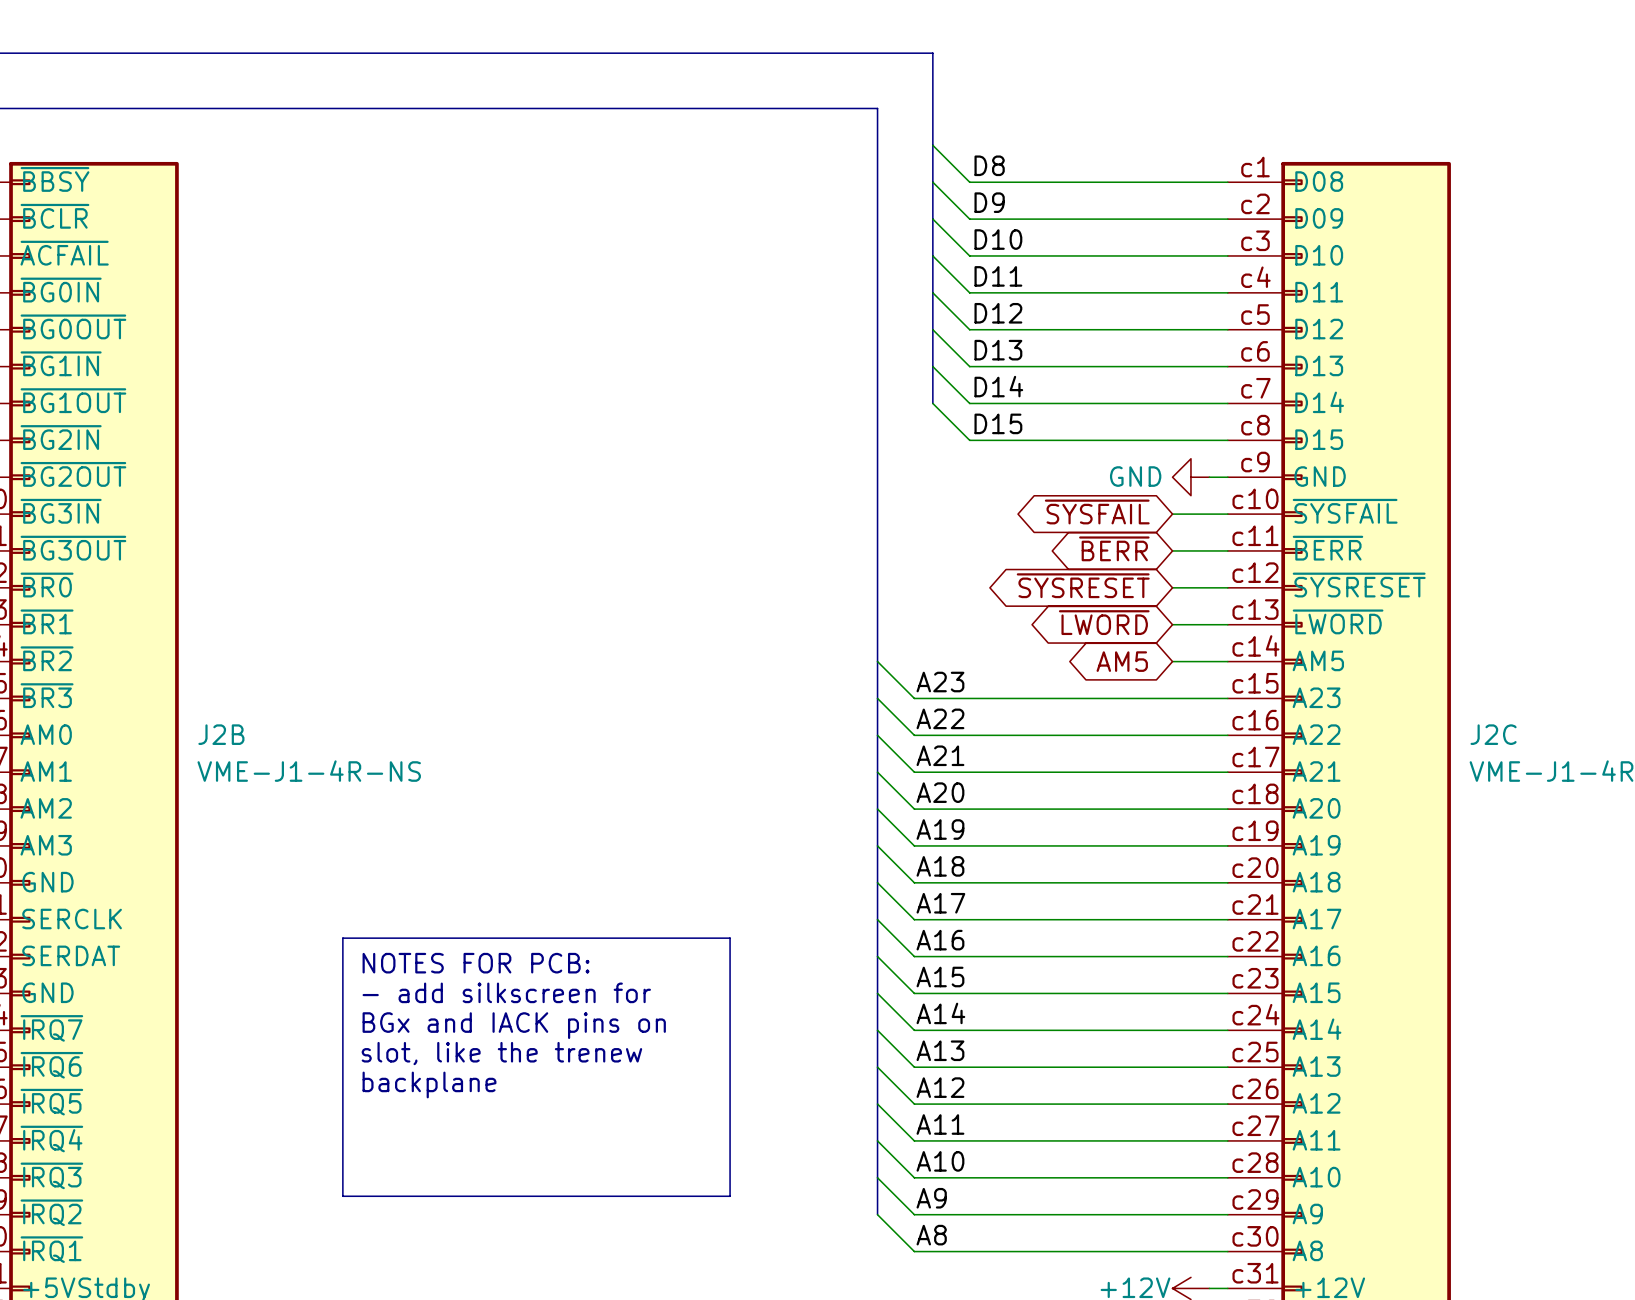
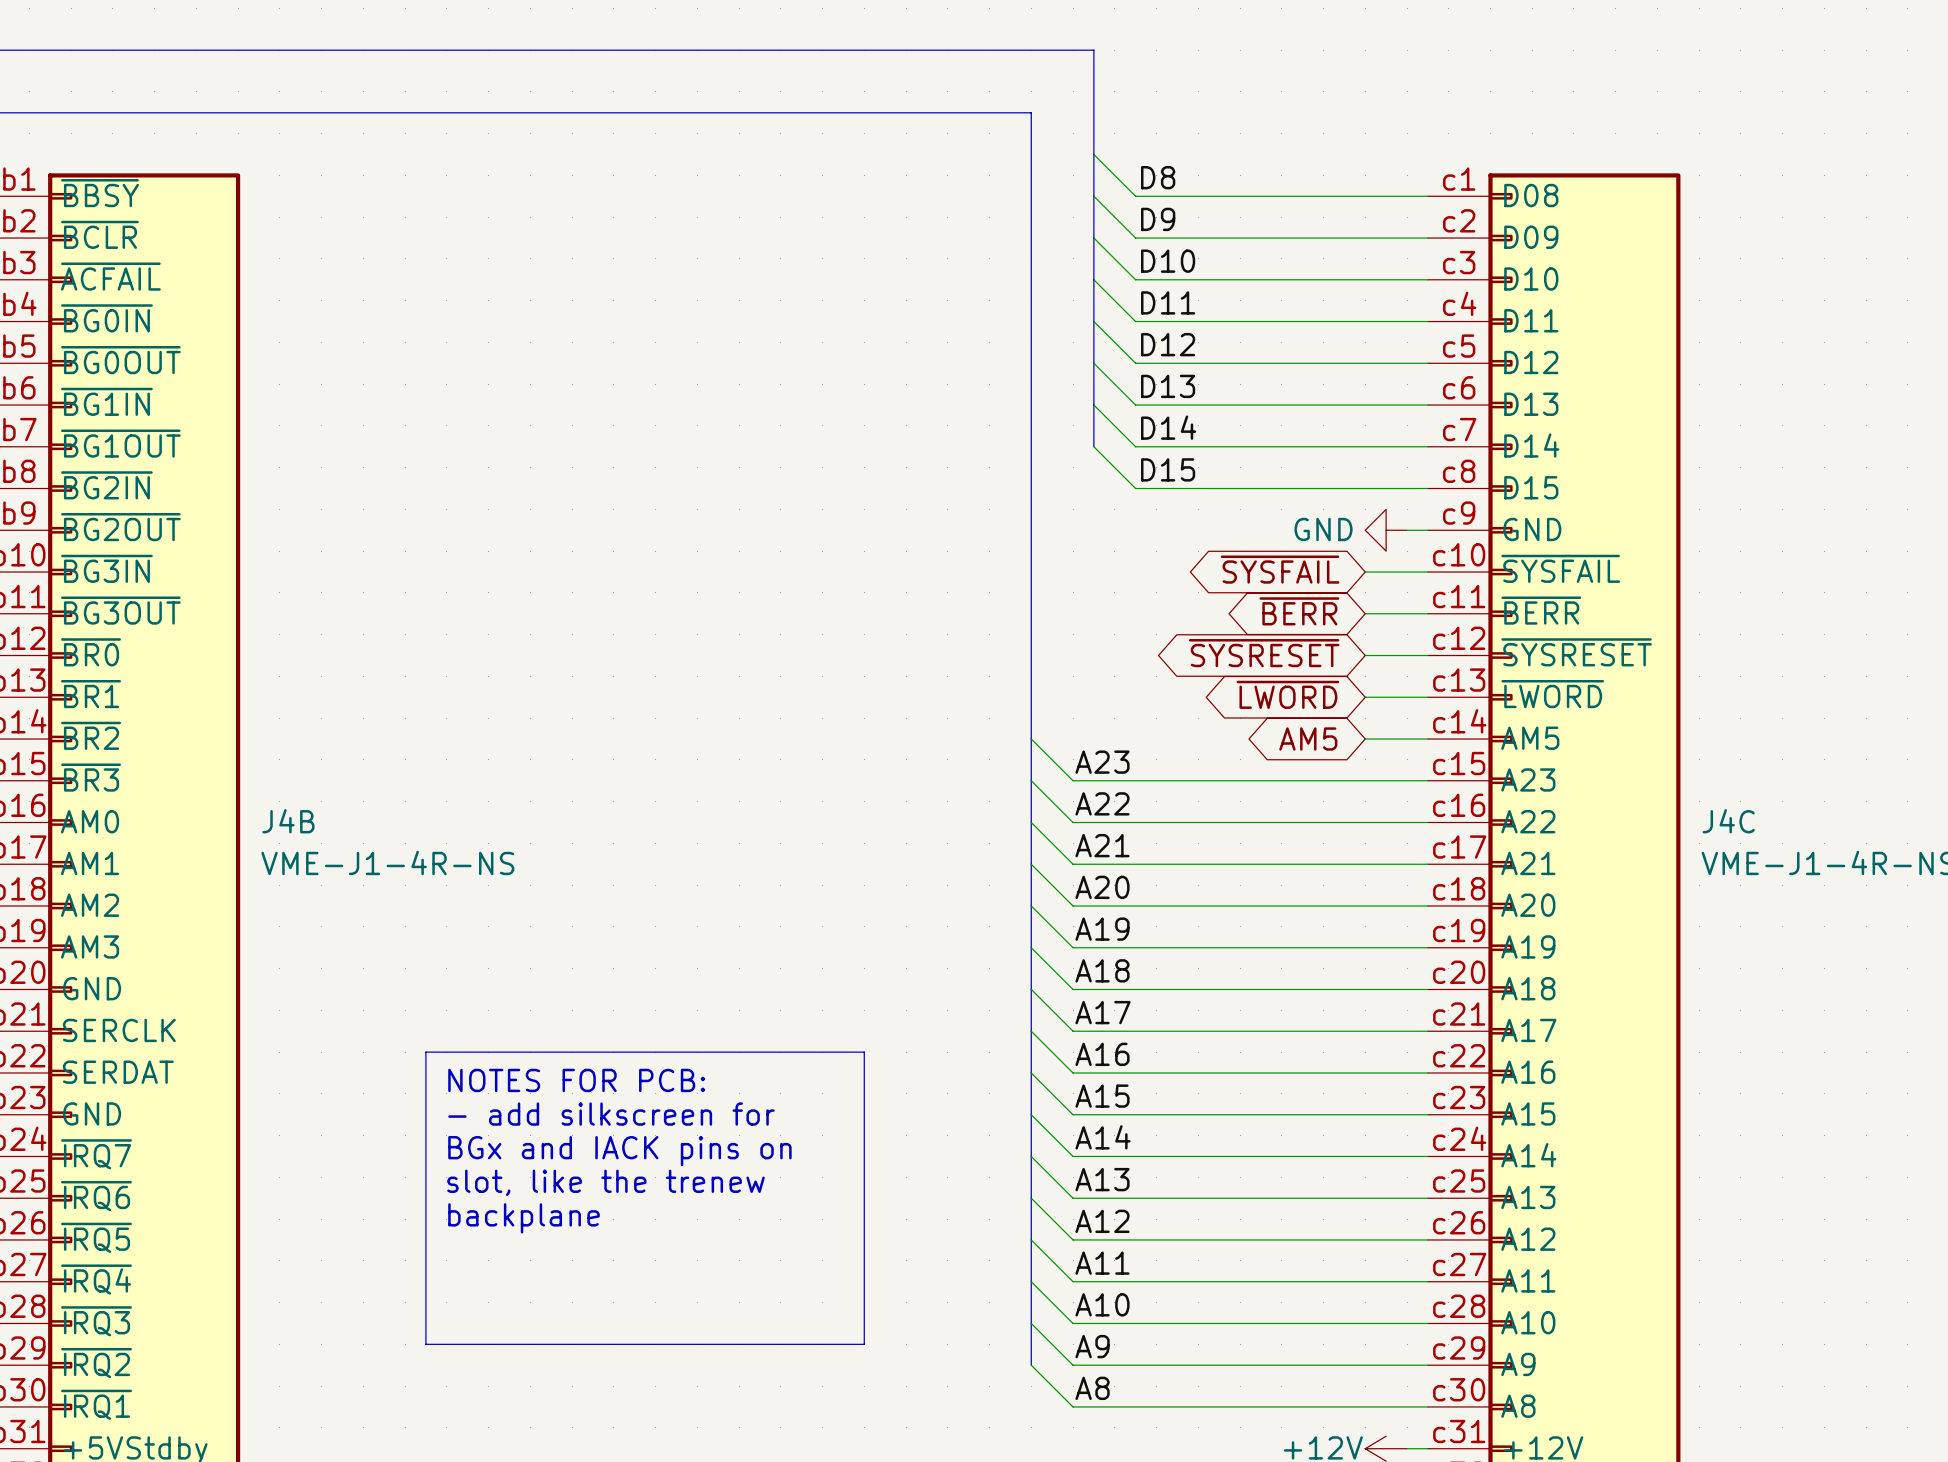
J2B name: J2B (221, 734) -> J4B (288, 821)
J2C name: J2C (1493, 734) -> J4C (1728, 821)

